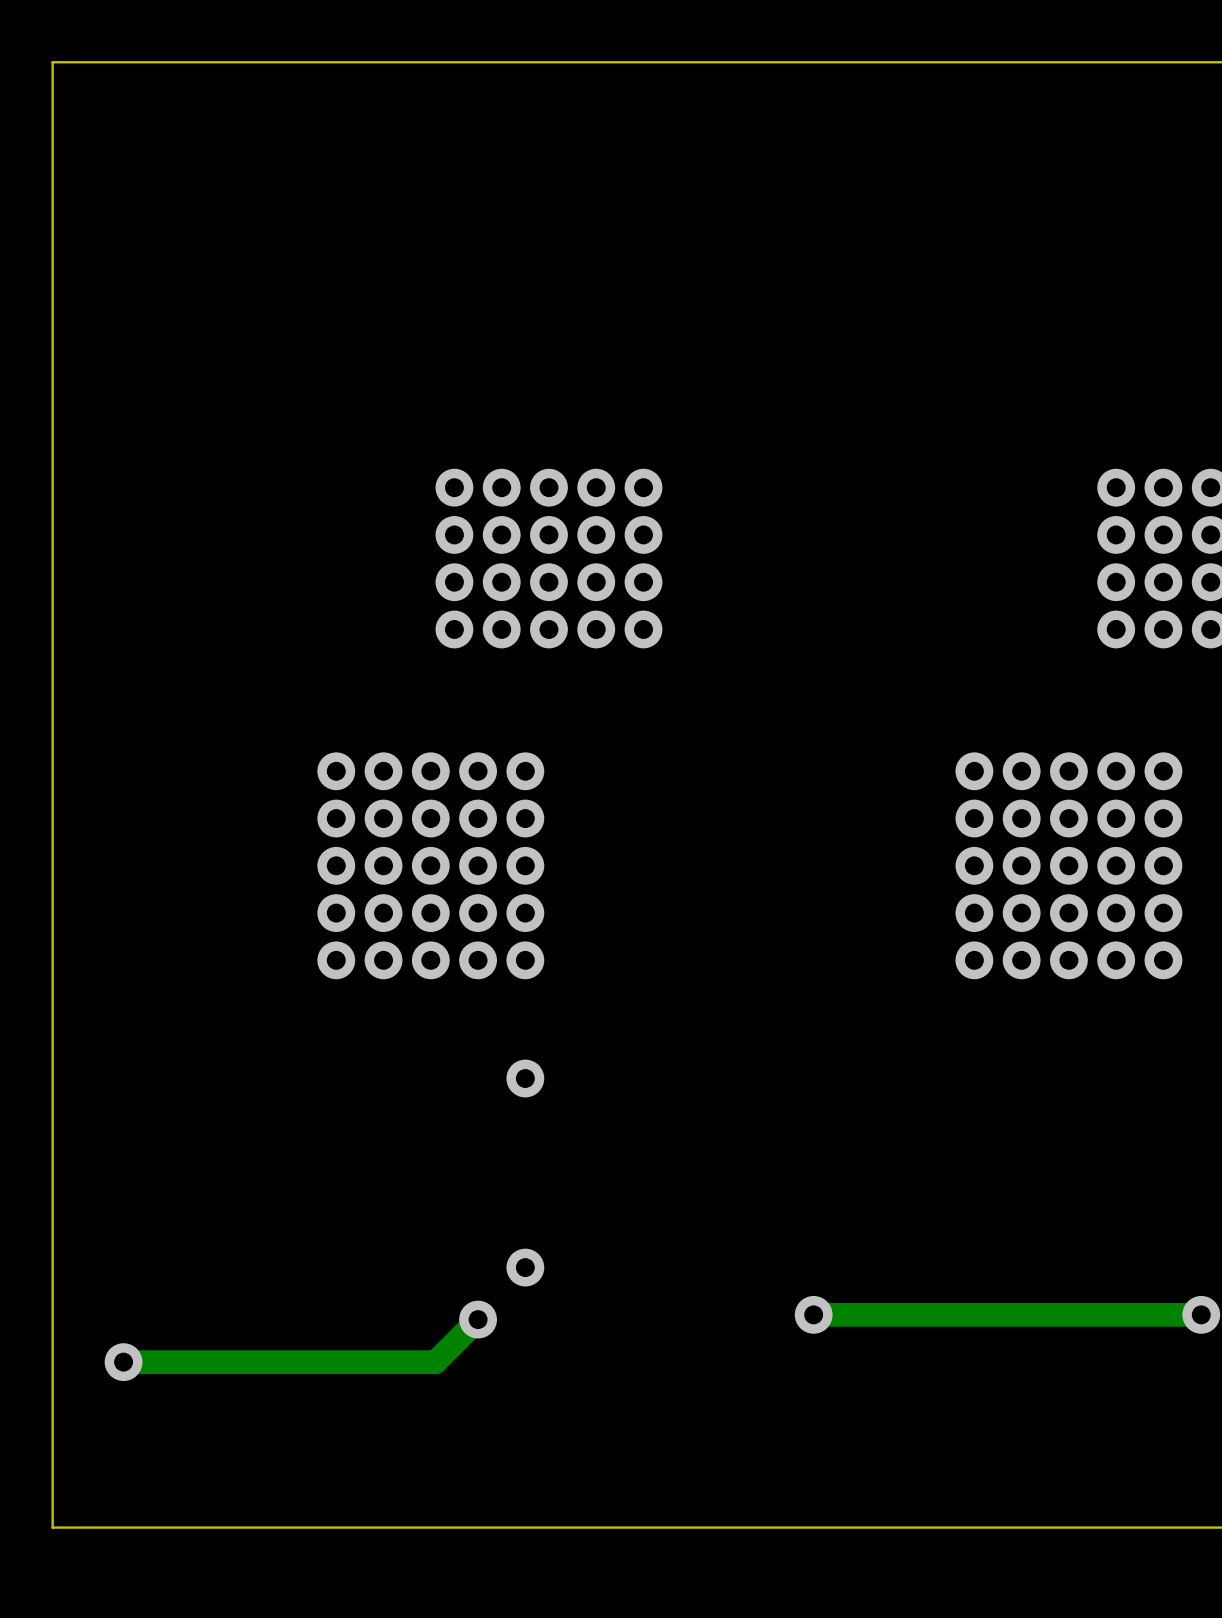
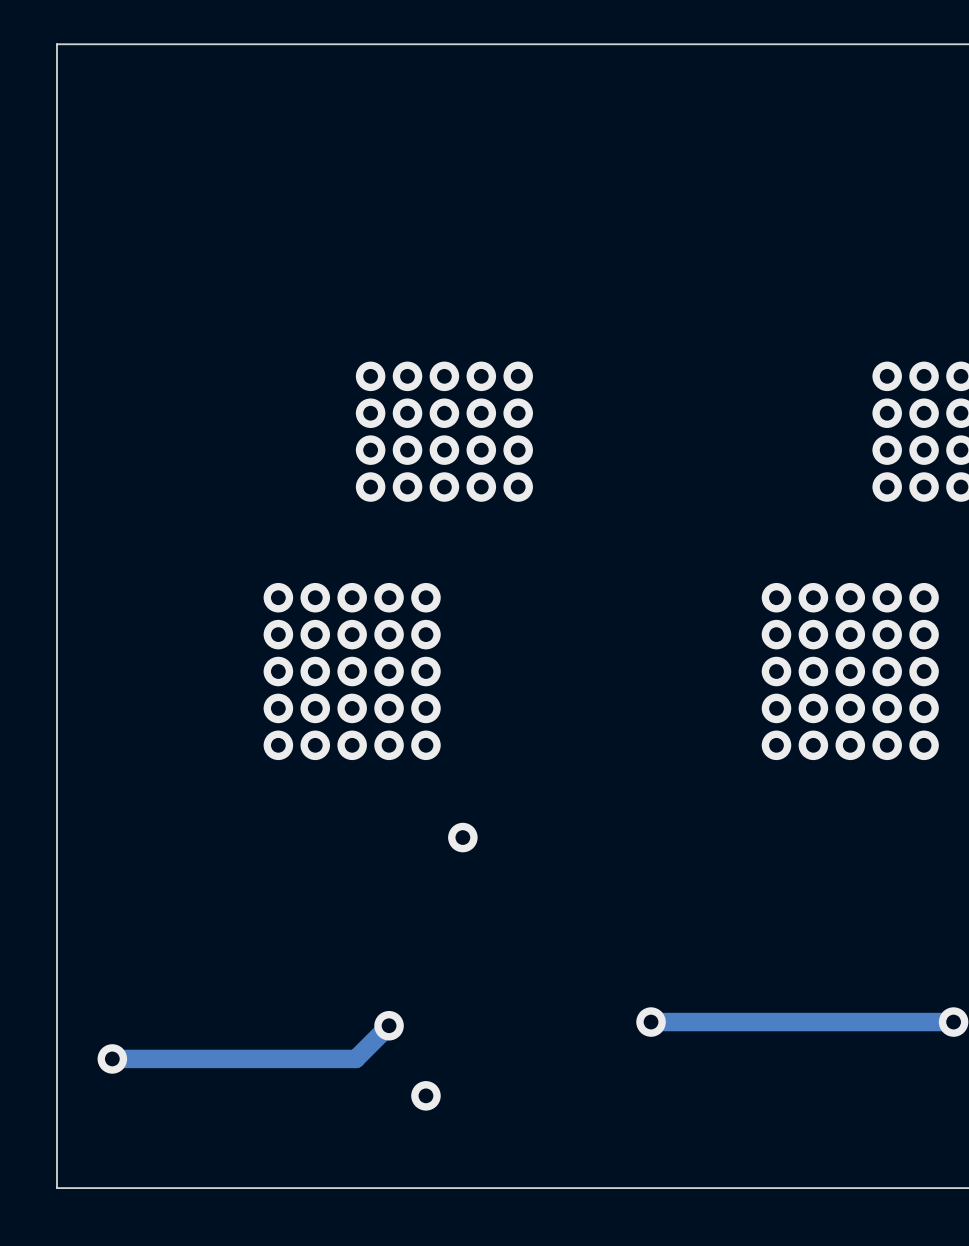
via position: (525, 1078) -> (462, 837)
via: (525, 1267) -> none
via: none -> (425, 1095)

